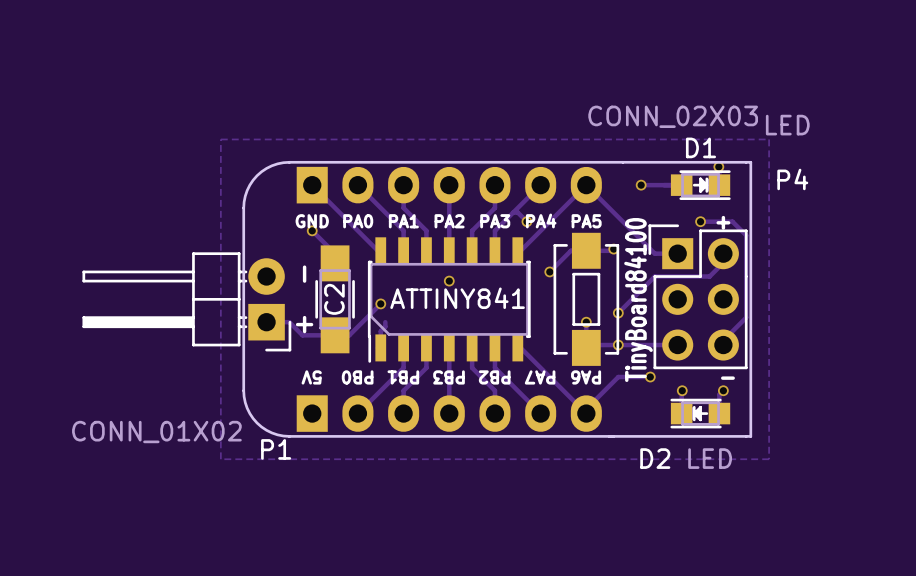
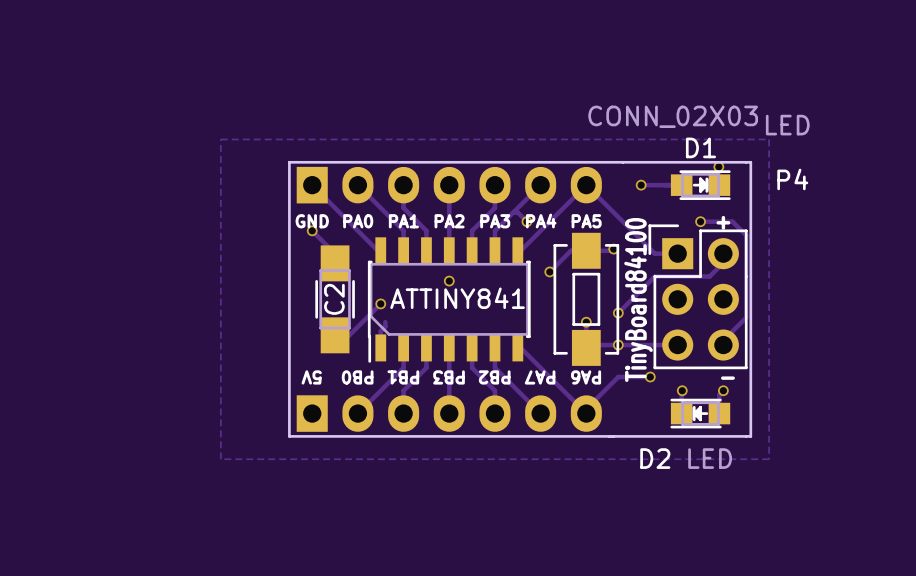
board edge: (289, 162) (271, 165) (257, 175) (247, 190) (243, 207) (245, 402) (249, 413) (261, 426) (277, 434) (289, 436) -> (289, 162) (289, 436)
text: + - (304, 299) -> none
P1: CONN_01X02 (186, 301) -> none
track: (266, 322) (289, 322) (302, 335) (335, 335) -> none

